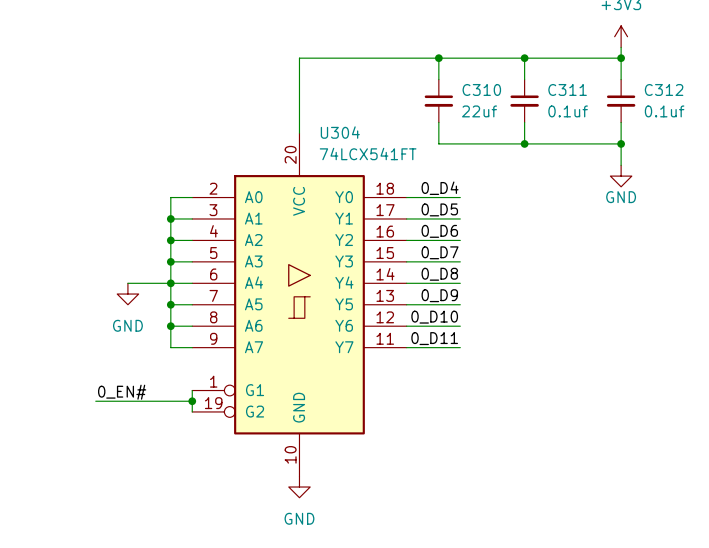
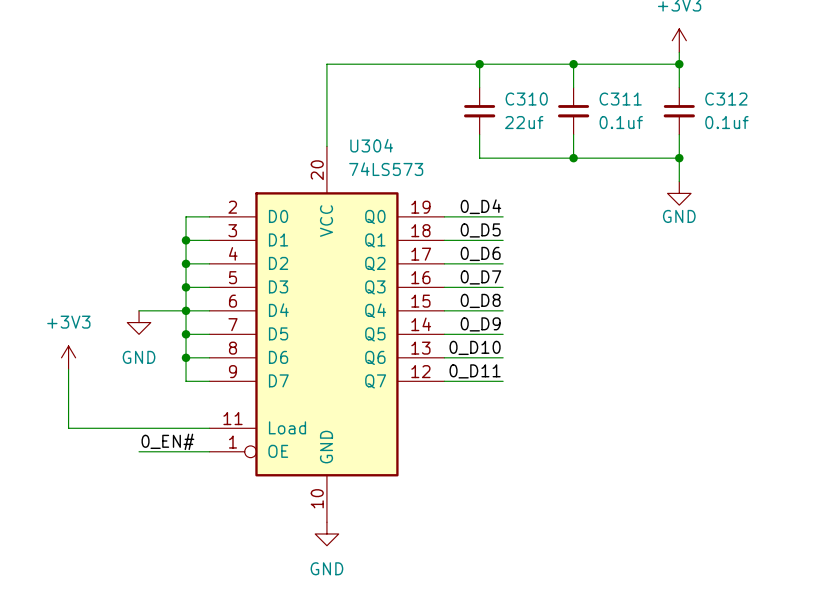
U304 symbol: [192, 133, 407, 477] -> [209, 146, 445, 523]
U304 value: 74LCX541FT (368, 154) -> 74LS573 (386, 169)
power symbol: none -> +3V3 (68, 357)
wire: none -> (68, 369) (68, 428) (209, 428)
wire: (192, 390) (192, 411) -> (139, 451) (209, 451)
label position: 0_EN# (122, 392) -> 0_EN# (167, 441)
wire: (95, 401) (192, 401) -> none
junction: (192, 401) -> none

